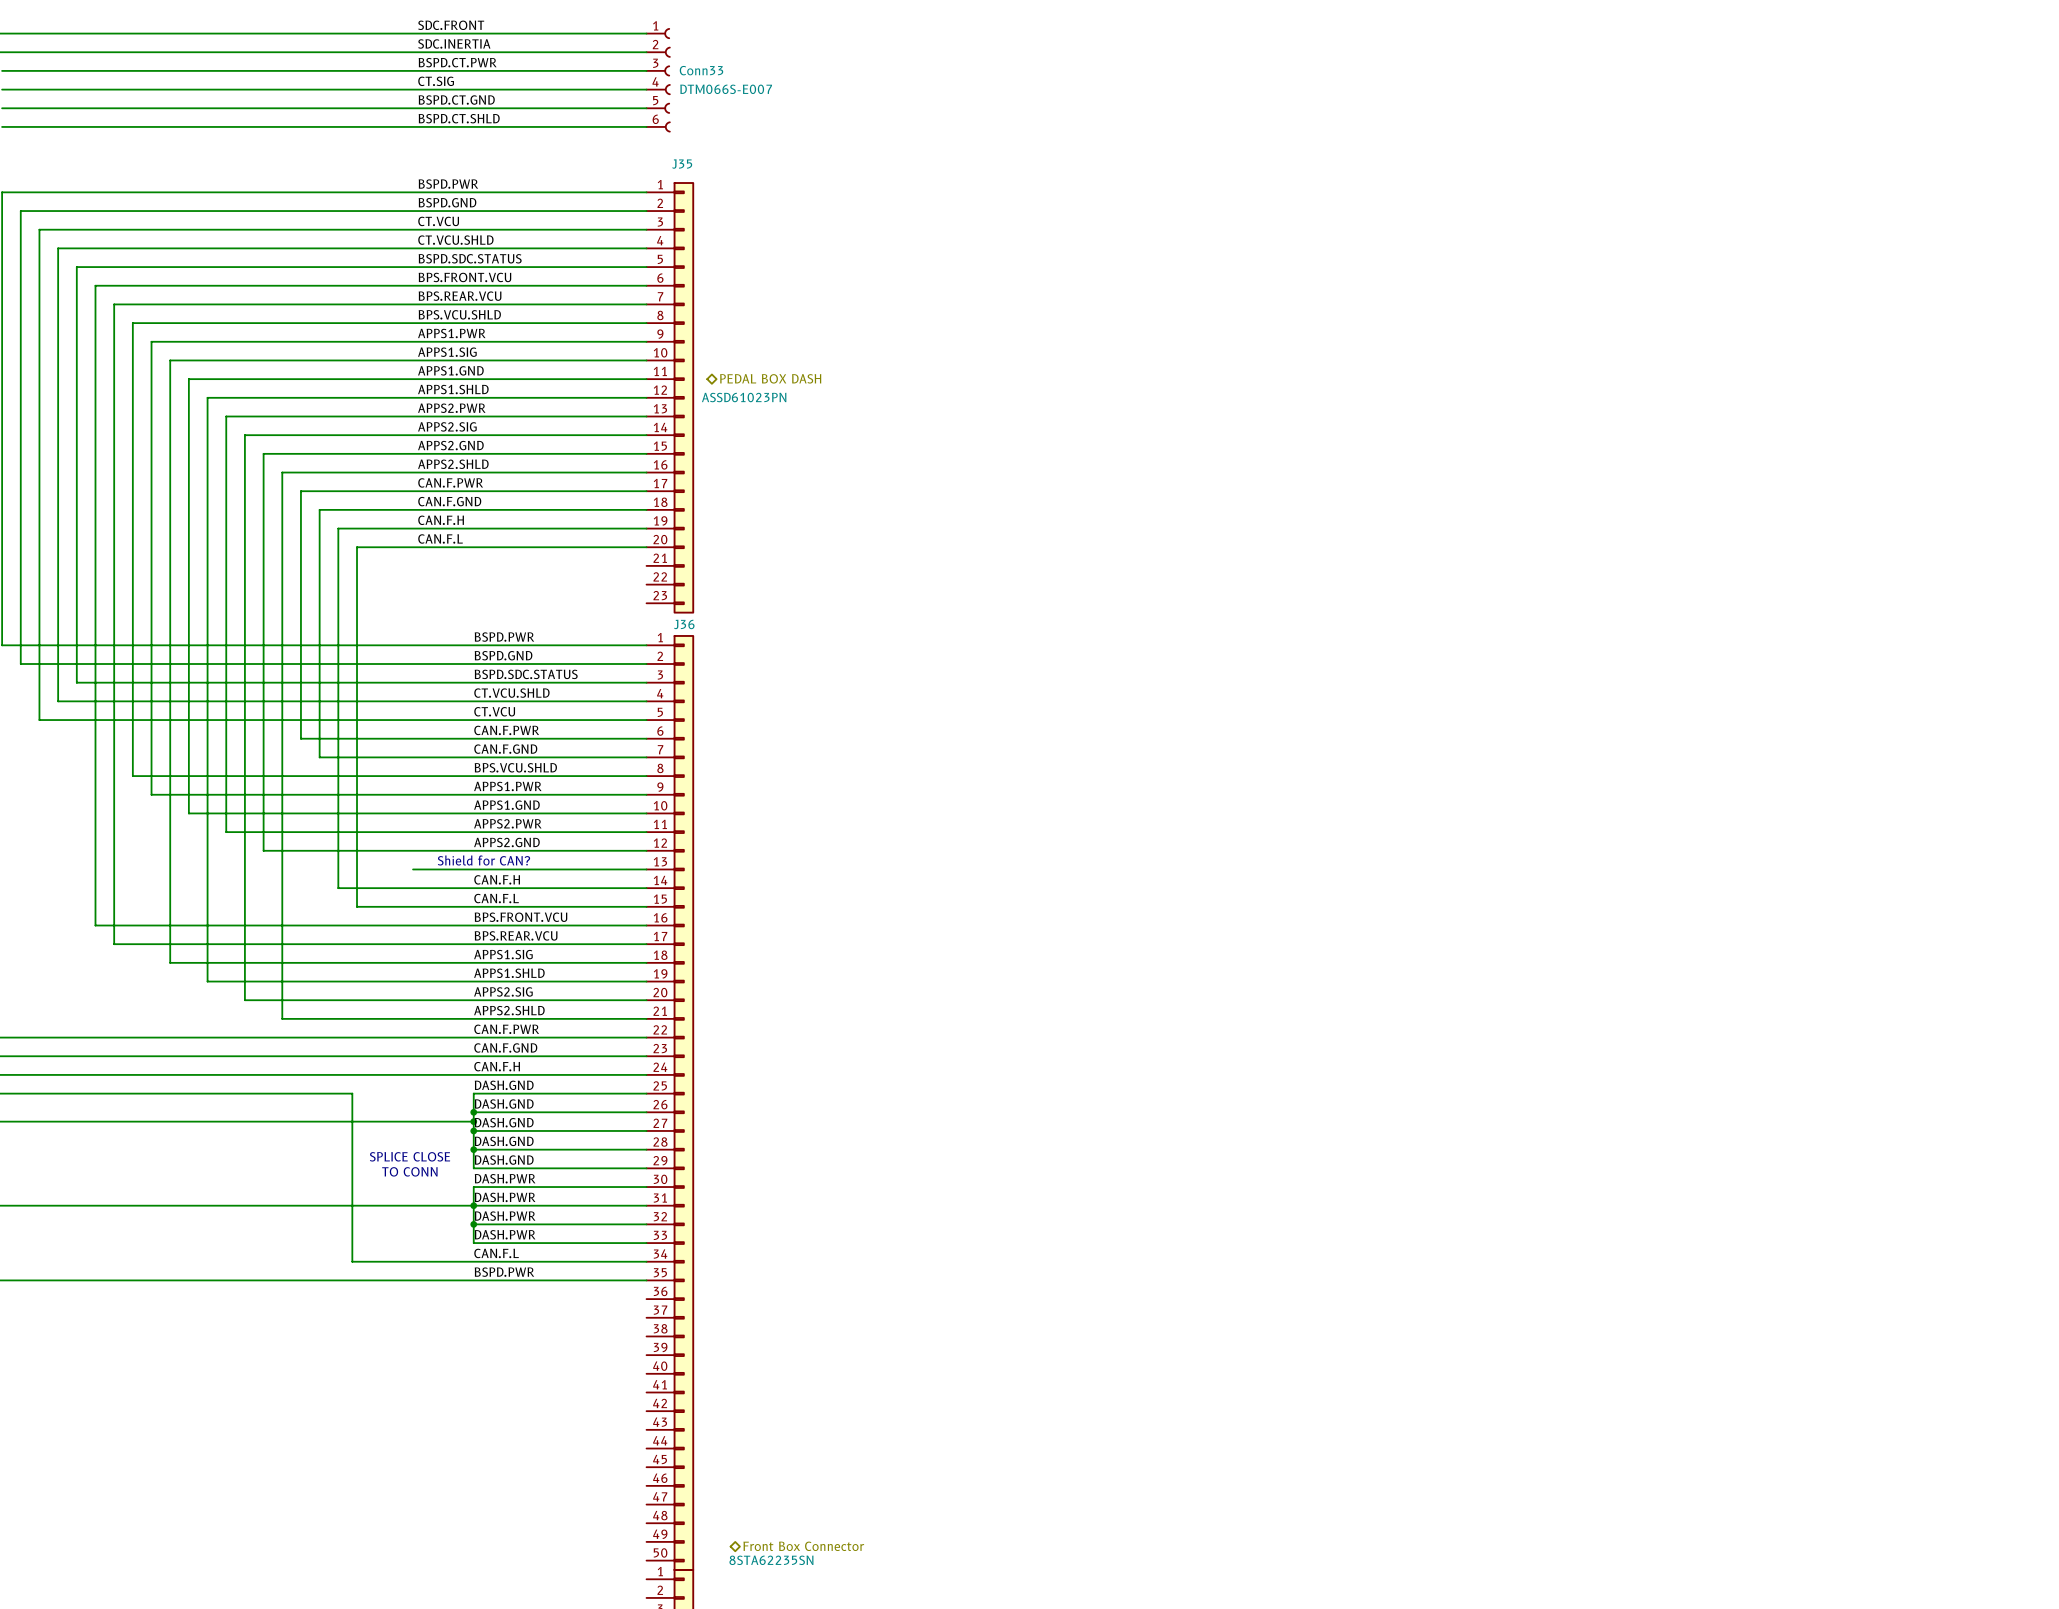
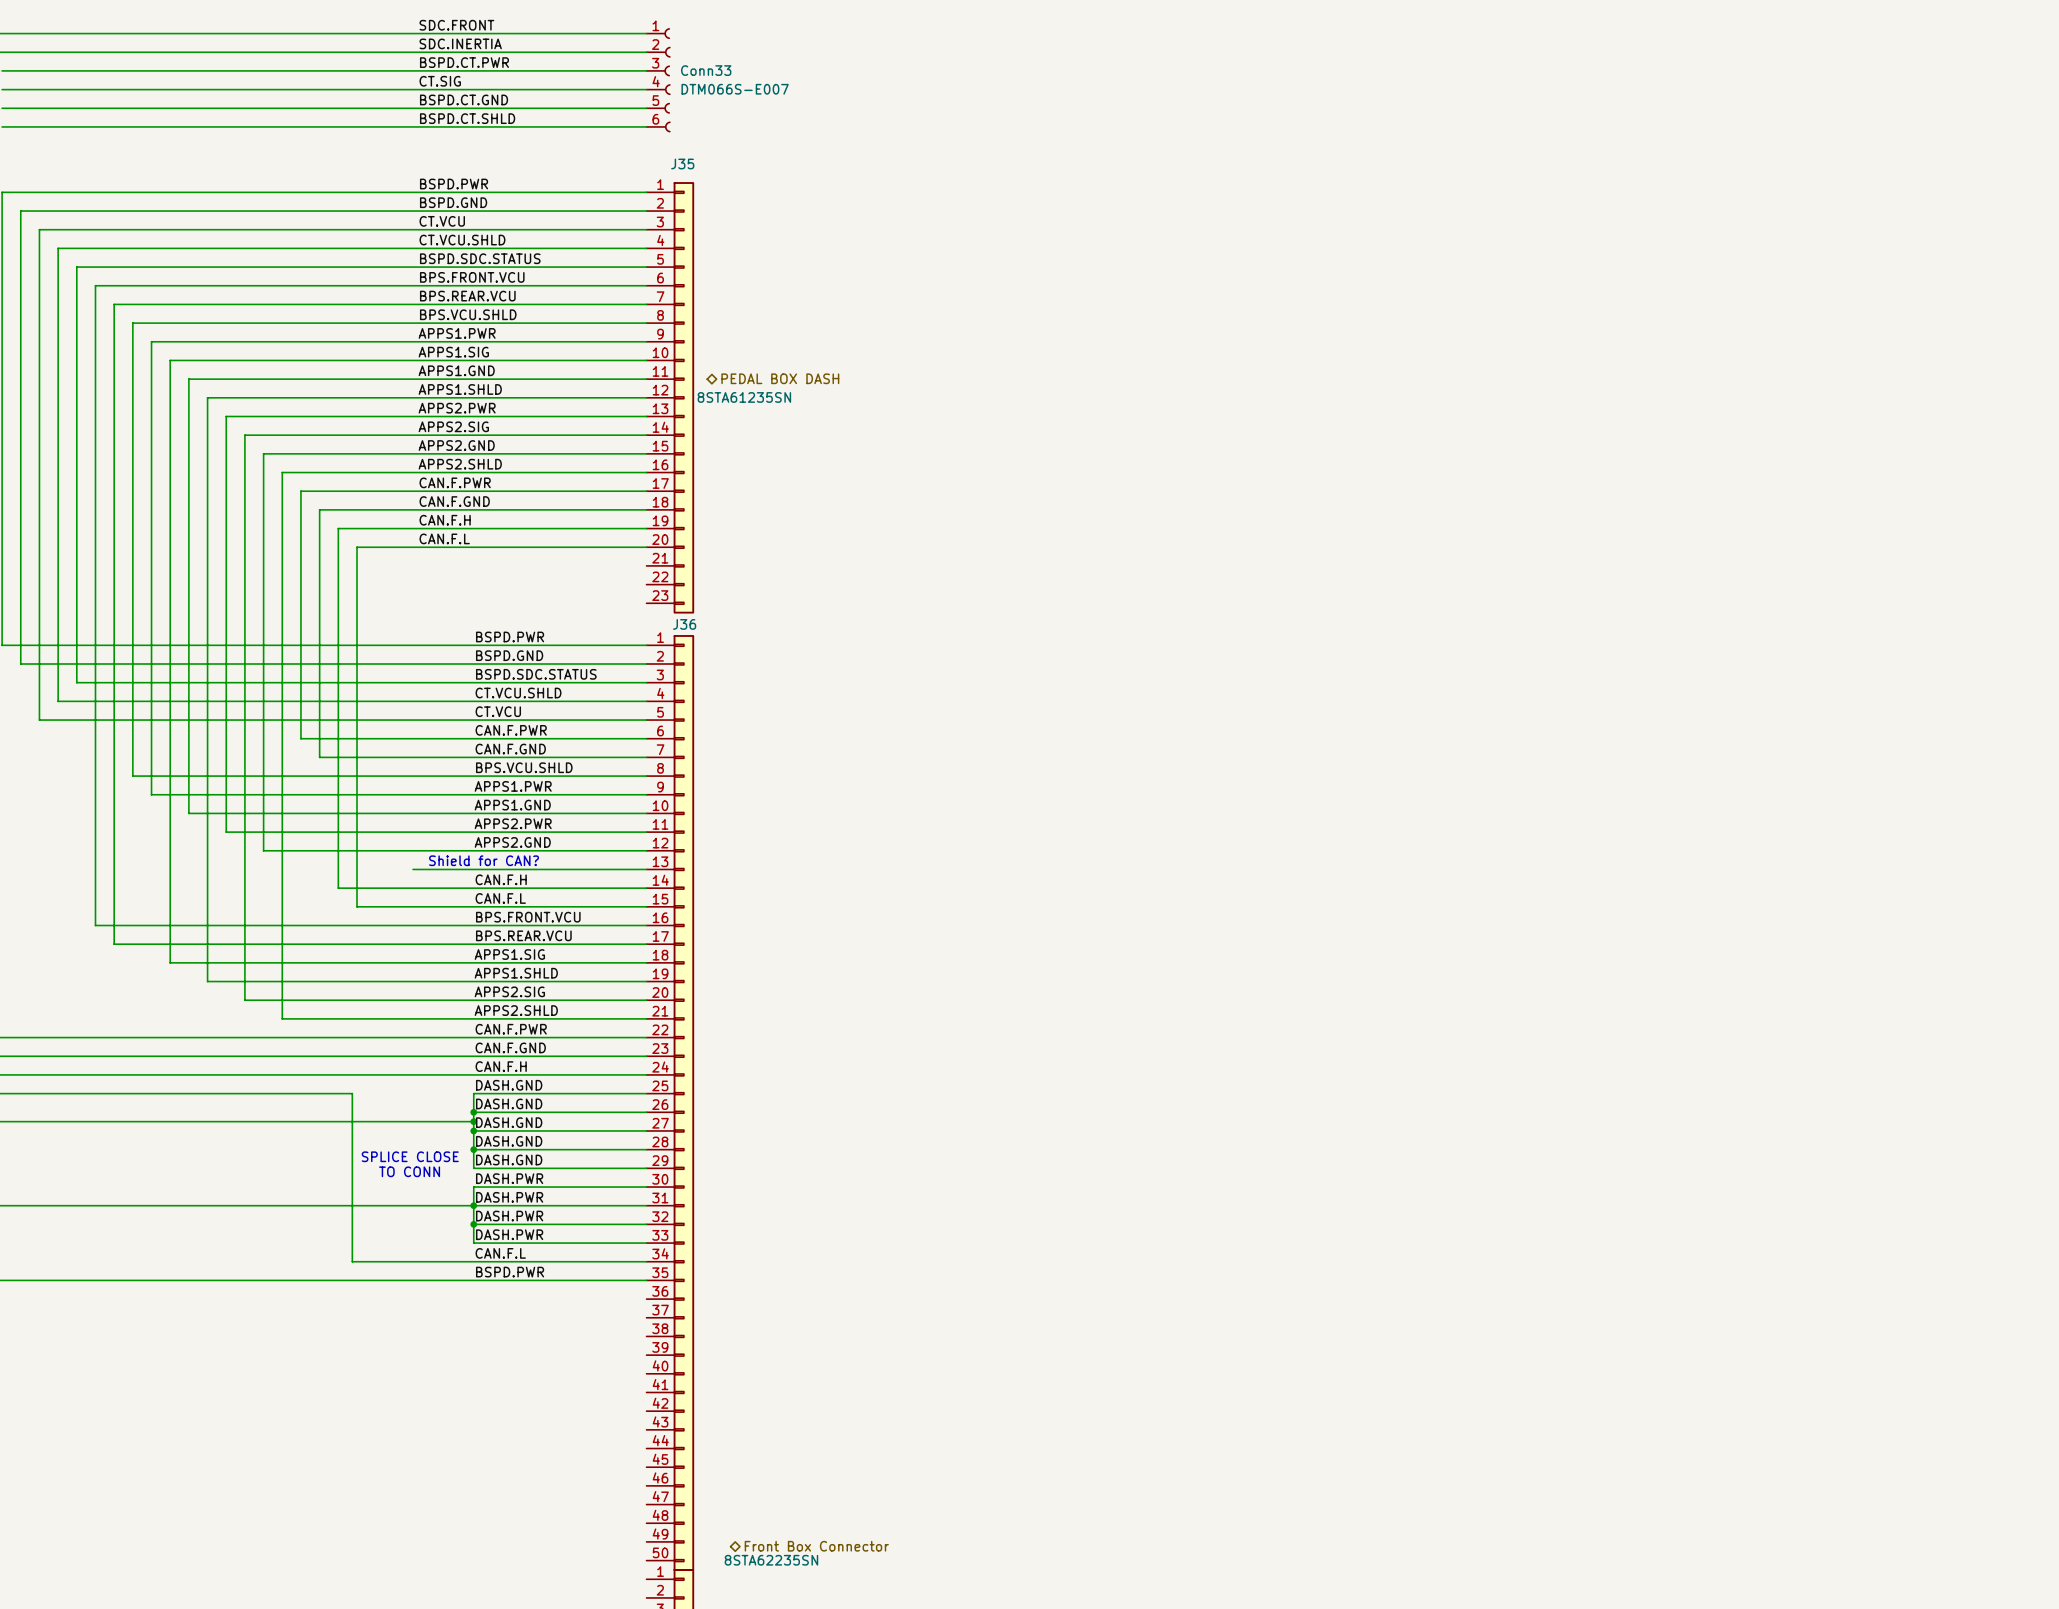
J35 value: ASSD61023PN (744, 397) -> 8STA61235SN (744, 397)

